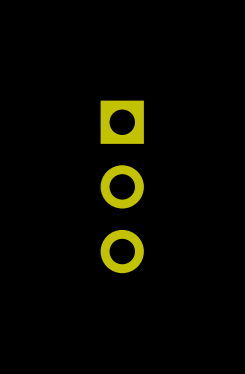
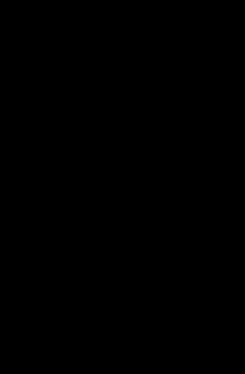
part: (122, 186) -> none

